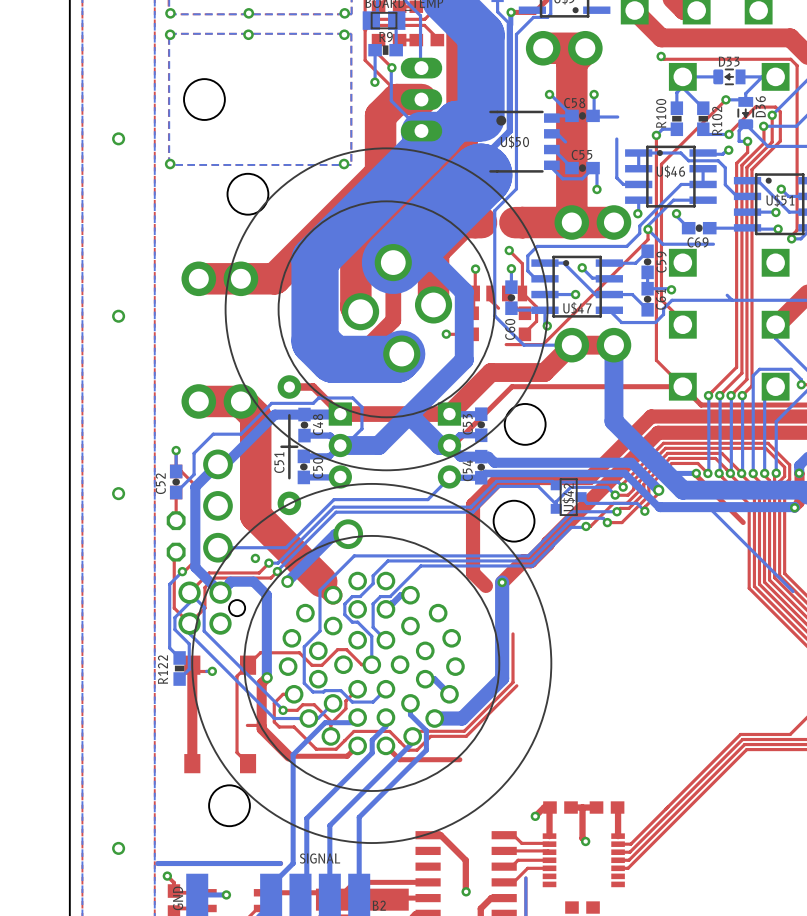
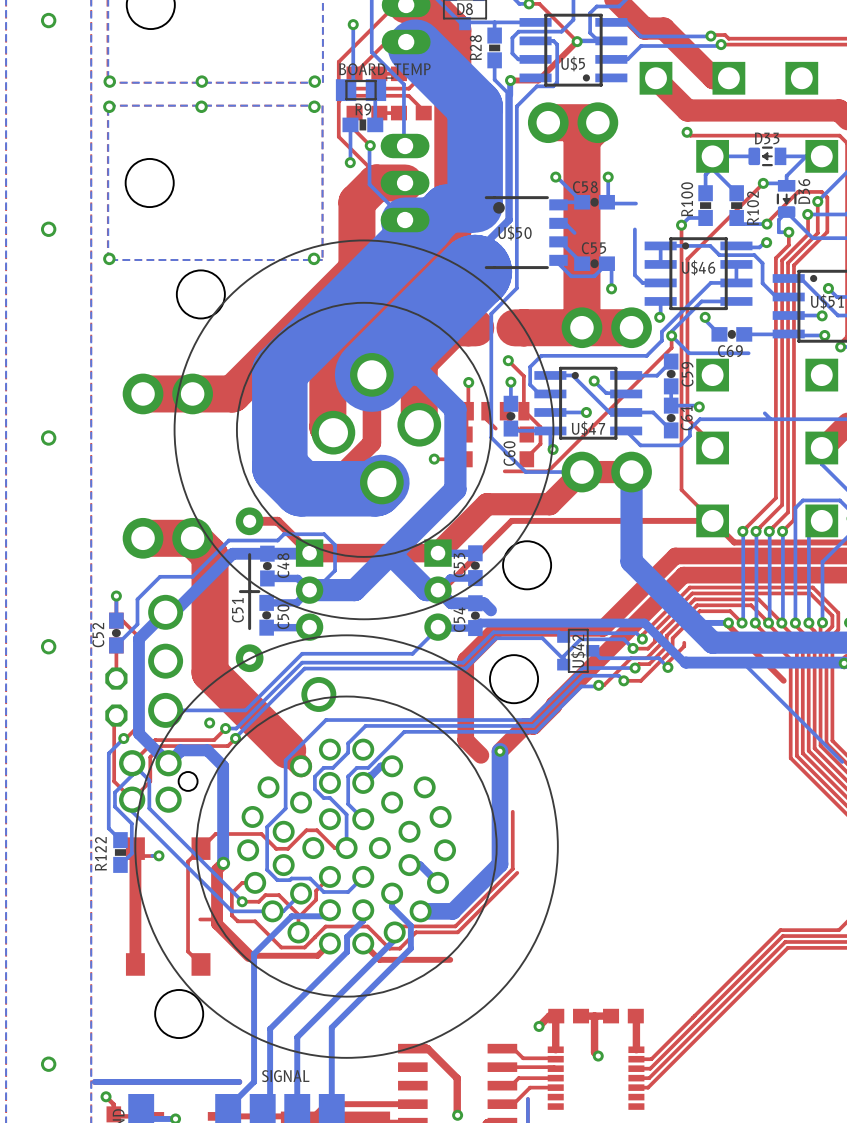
bottom track: (494, 462) (631, 462) (658, 490) -> none
via: (658, 490) -> none
bottom track: (348, 534) (334, 534) (287, 581) -> none
via: (287, 581) -> none

